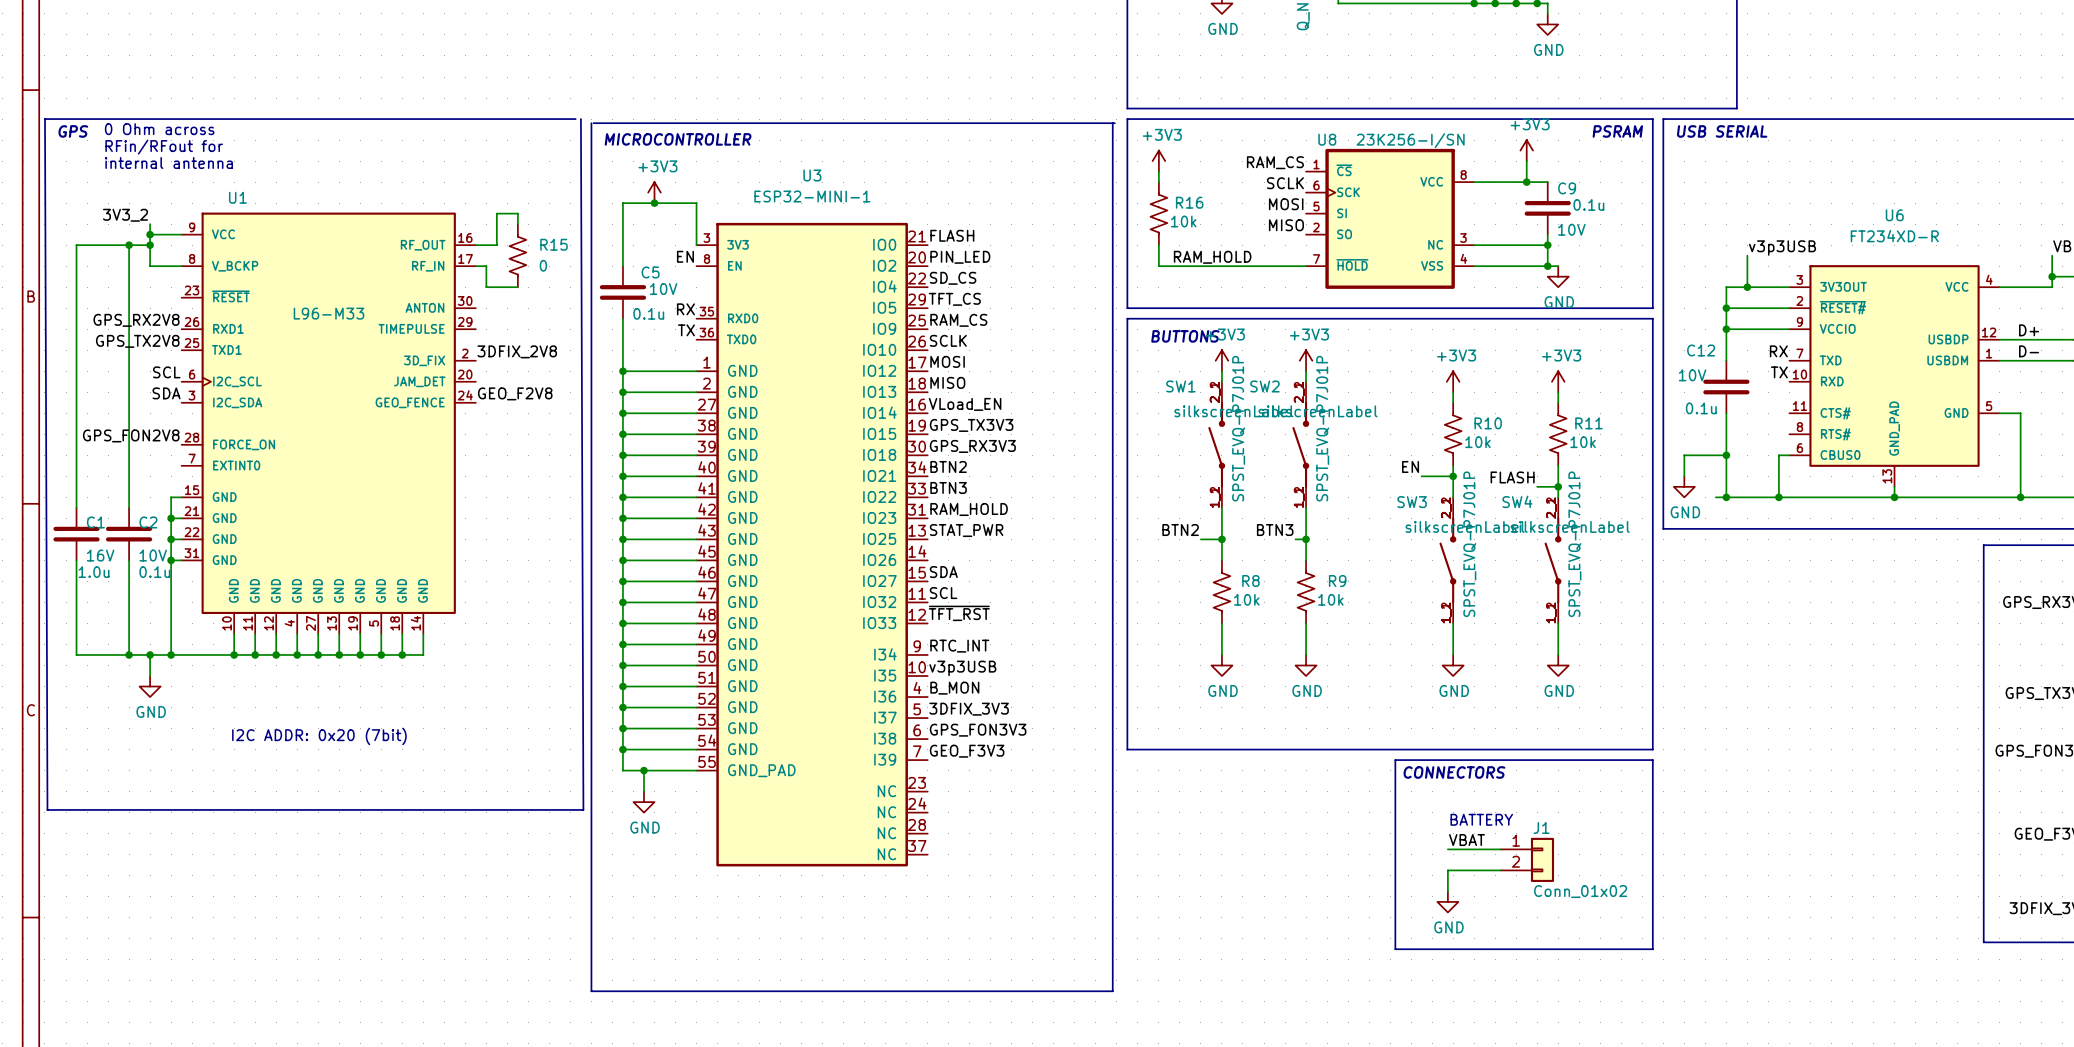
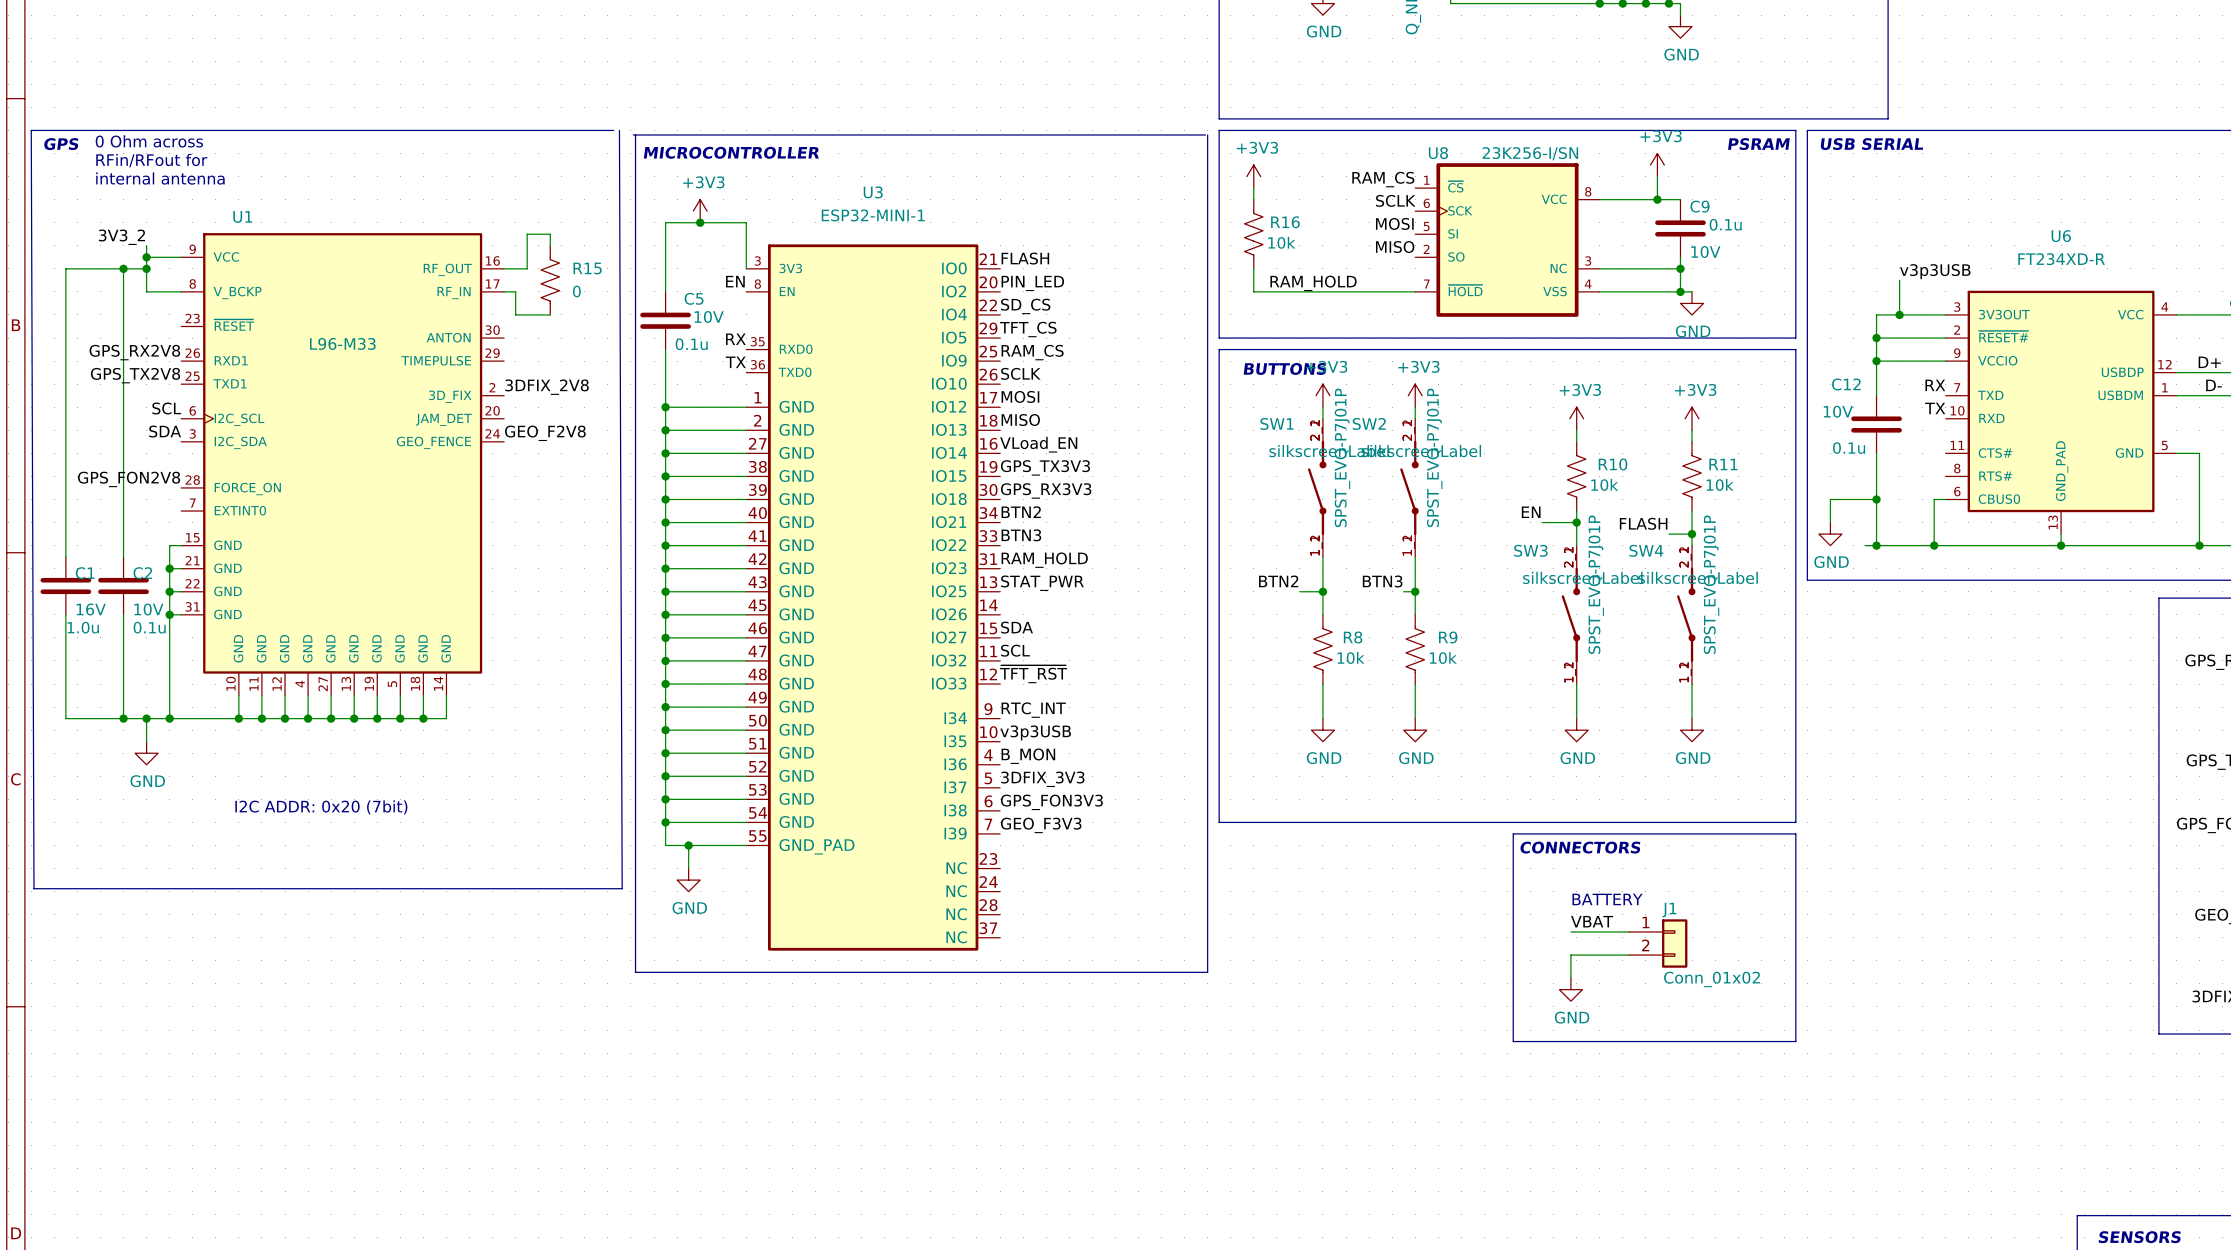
line: (591, 123) (591, 991) (1112, 991) (1112, 123) -> none
line: none -> (635, 134) (635, 972) (1207, 972) (1207, 134)

